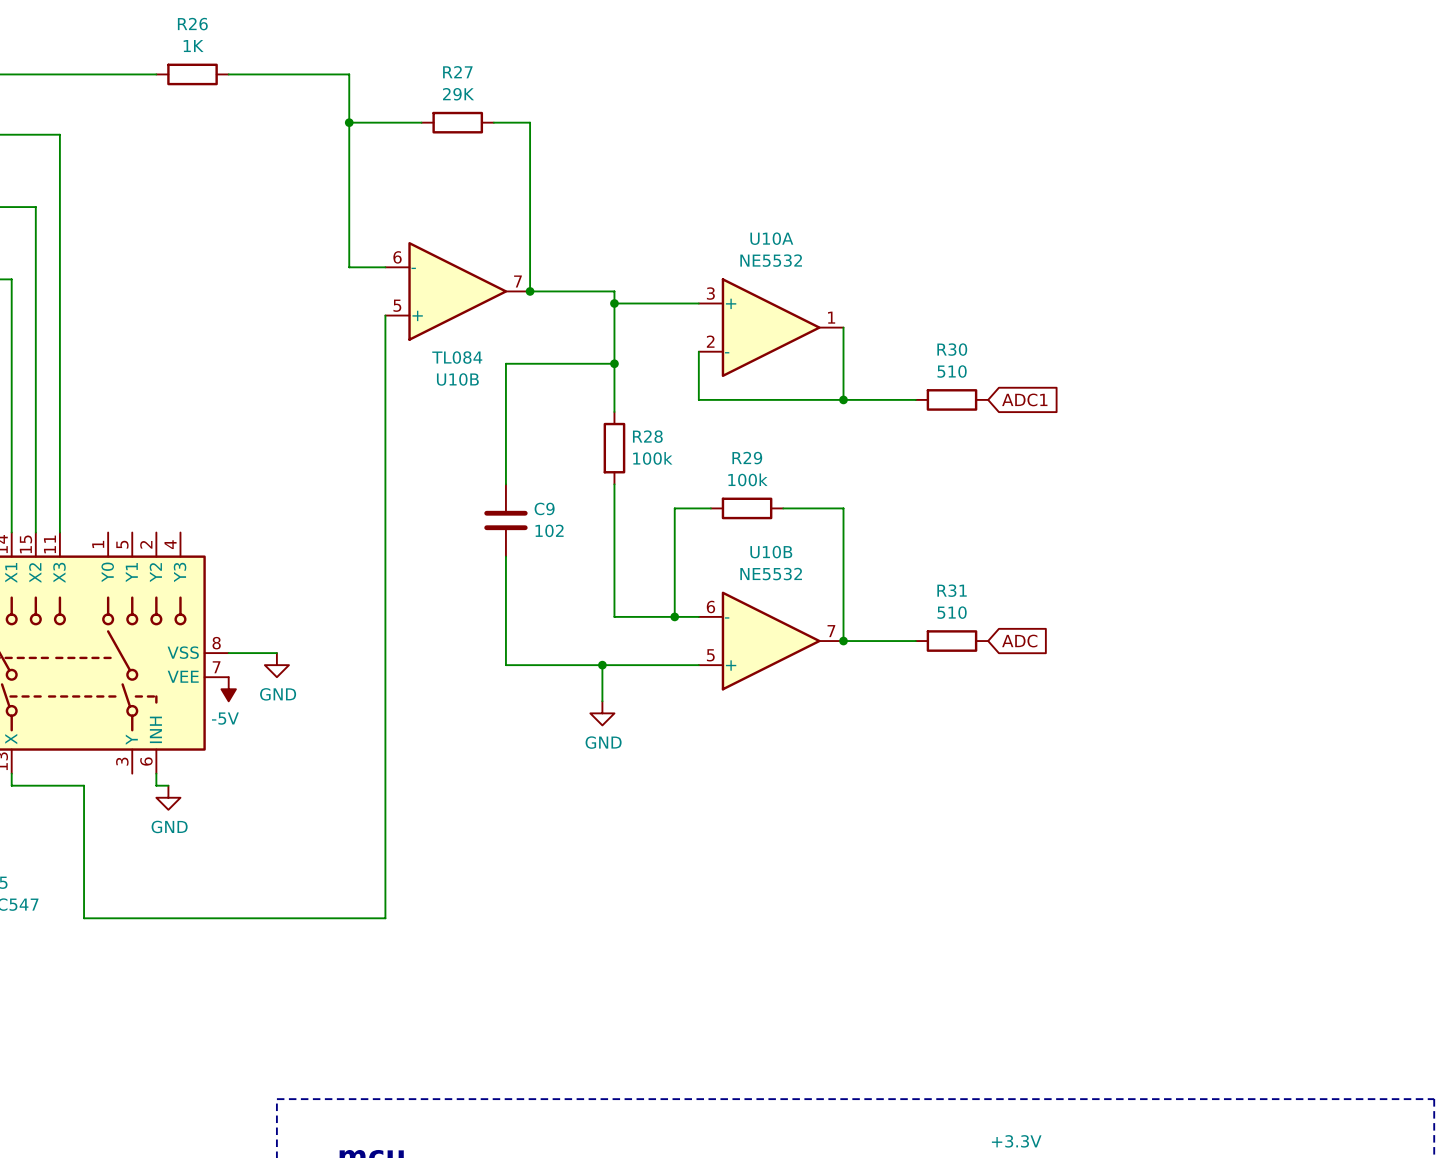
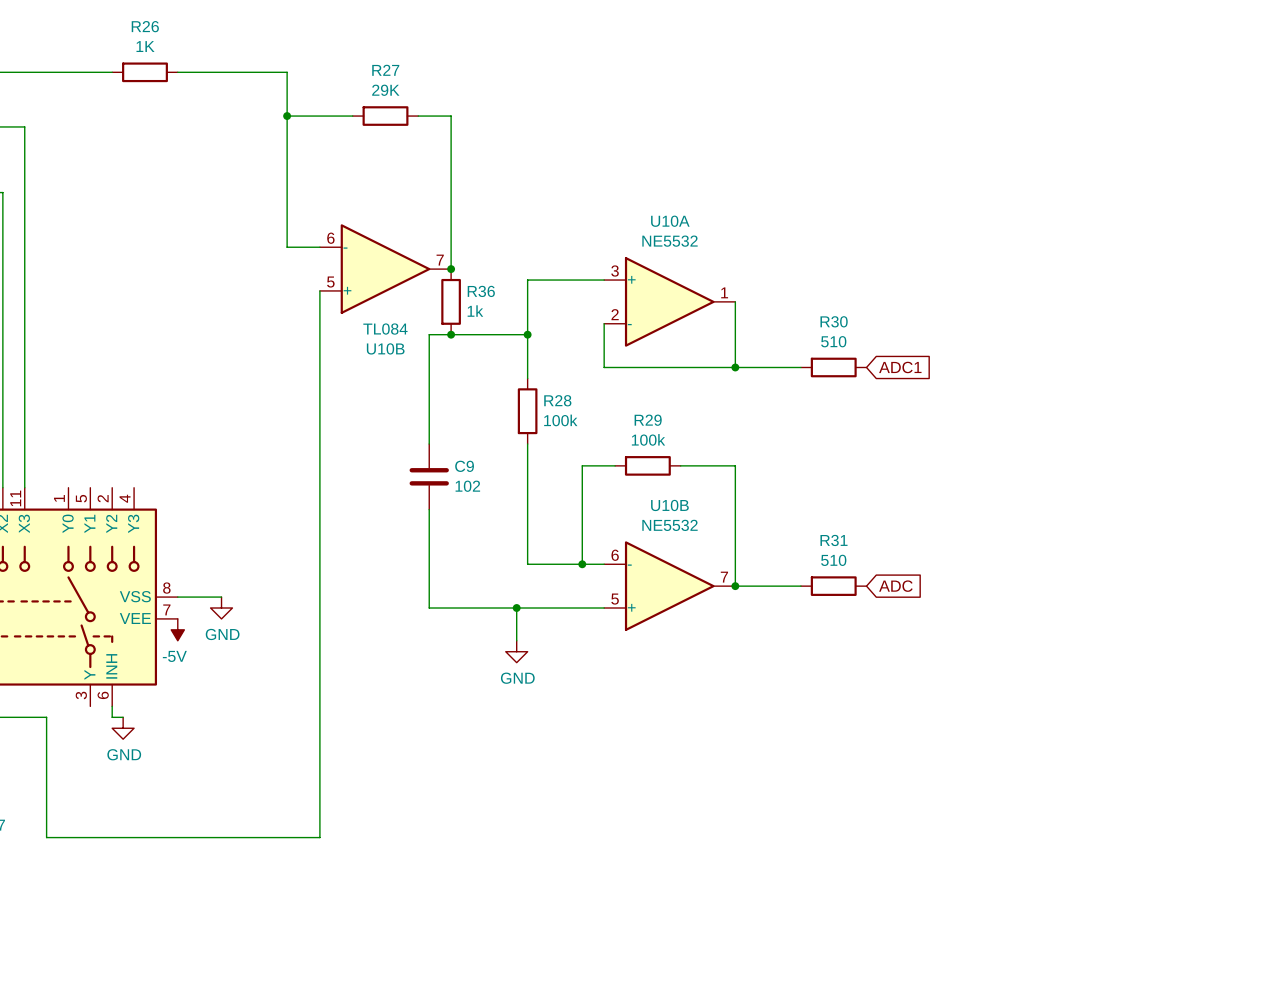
wire: (530, 291) (614, 291) (614, 303) -> none
junction: (614, 303) -> none
R36: none -> 1k (451, 301)
junction: none -> (451, 334)

